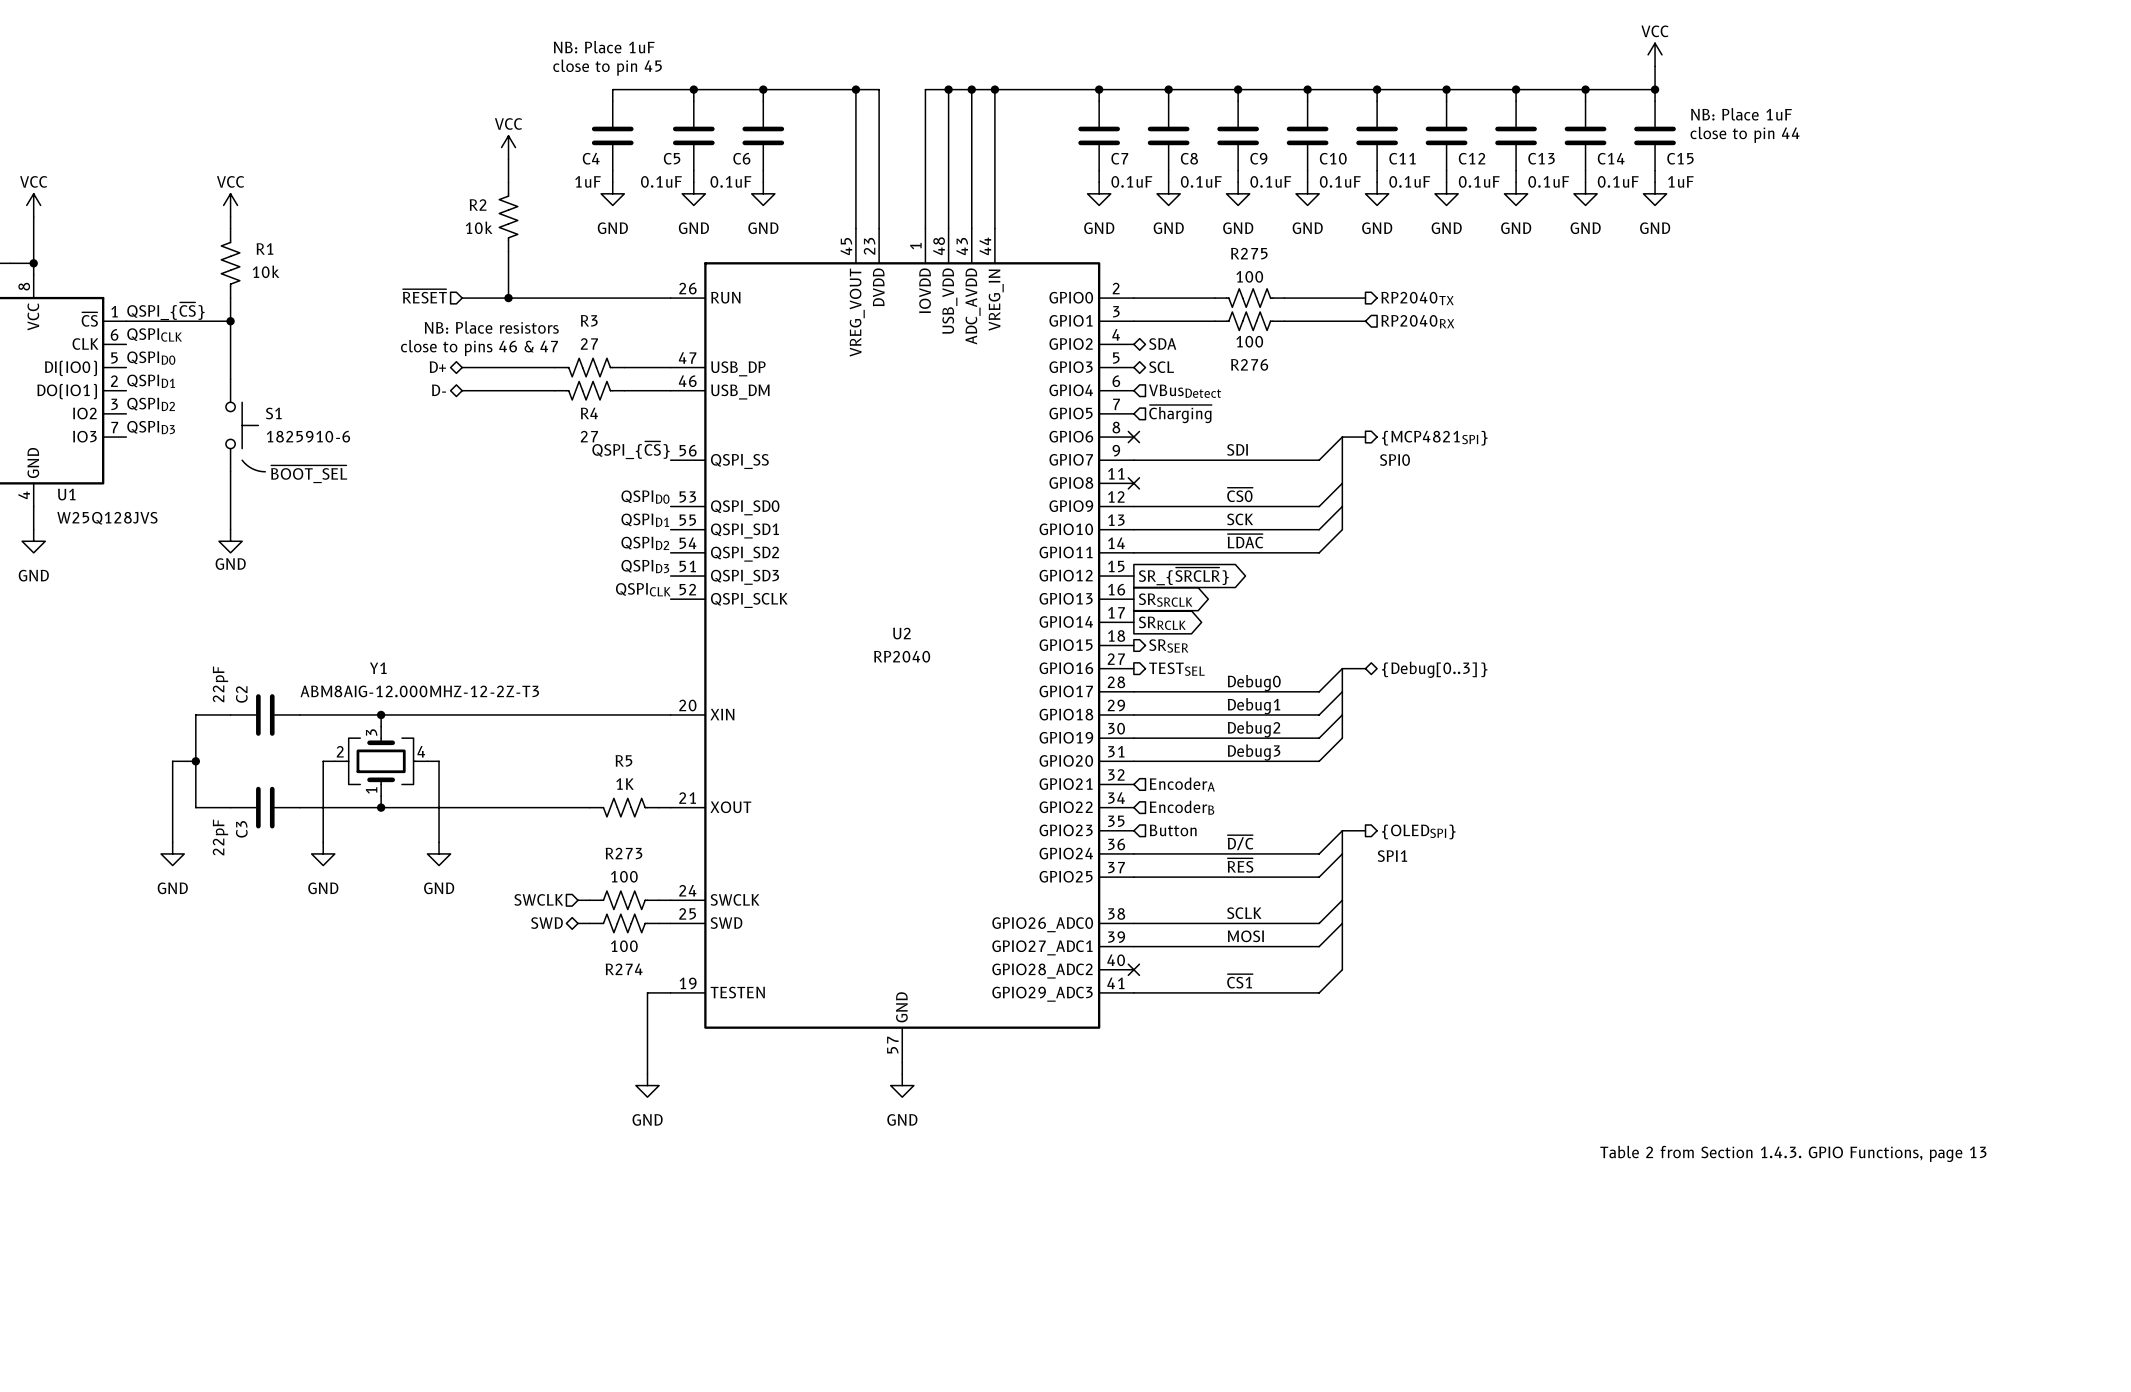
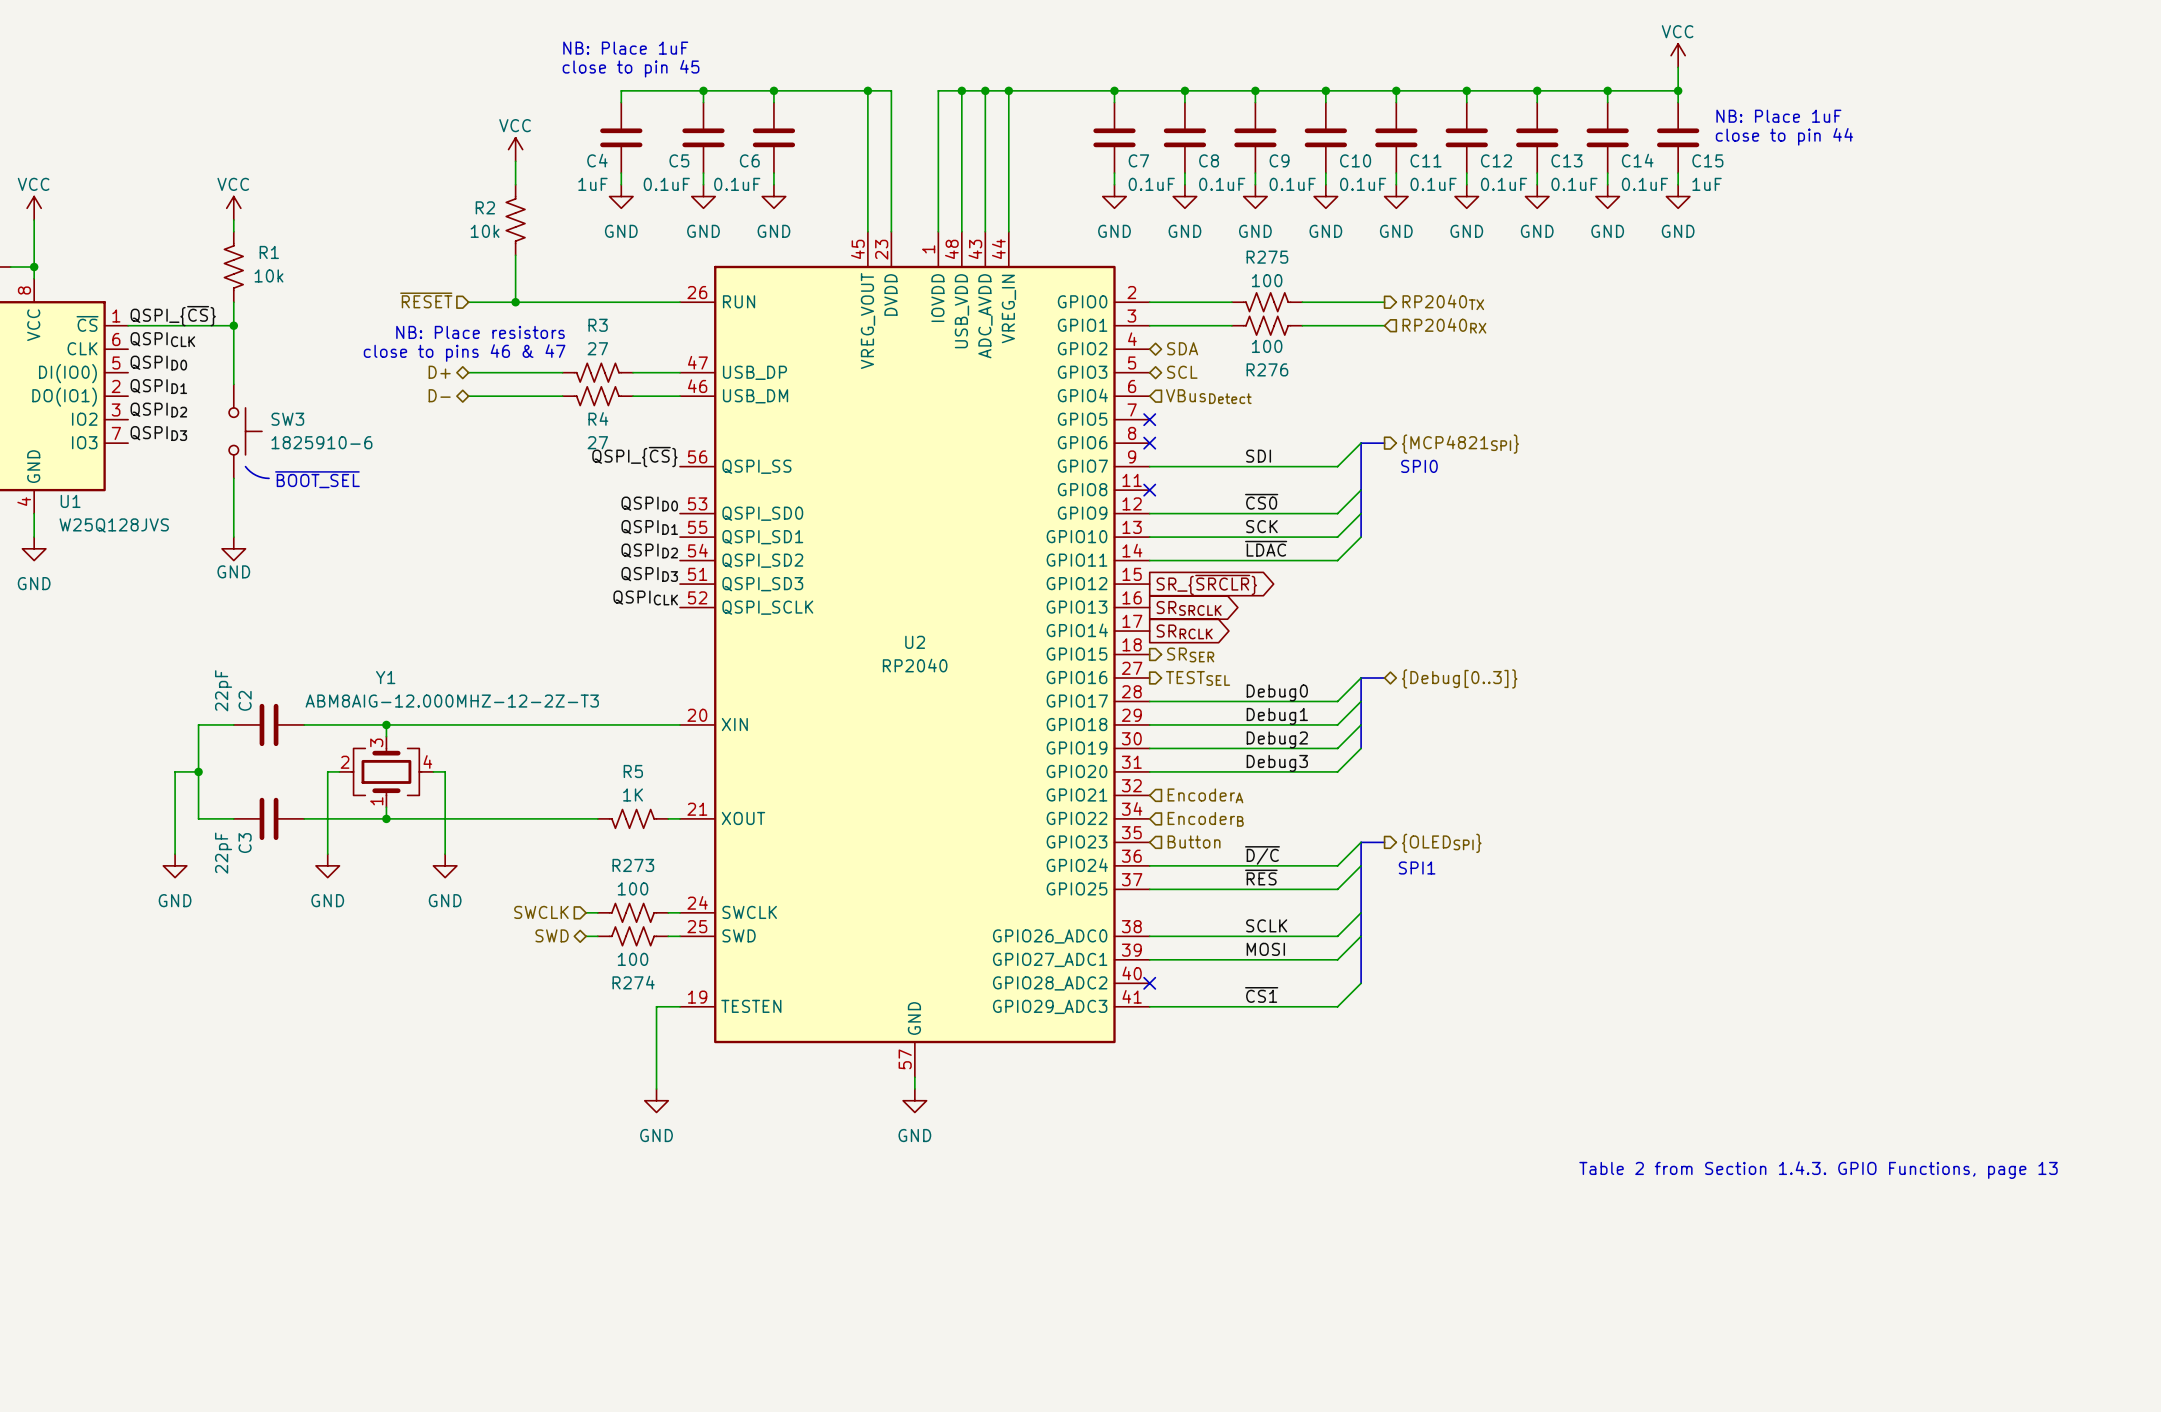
S1 name: S1 (273, 413) -> SW3 (287, 419)
no-connect mark: none -> (1149, 419)
hierarchical label: ~{Charging} (1180, 414) -> none

